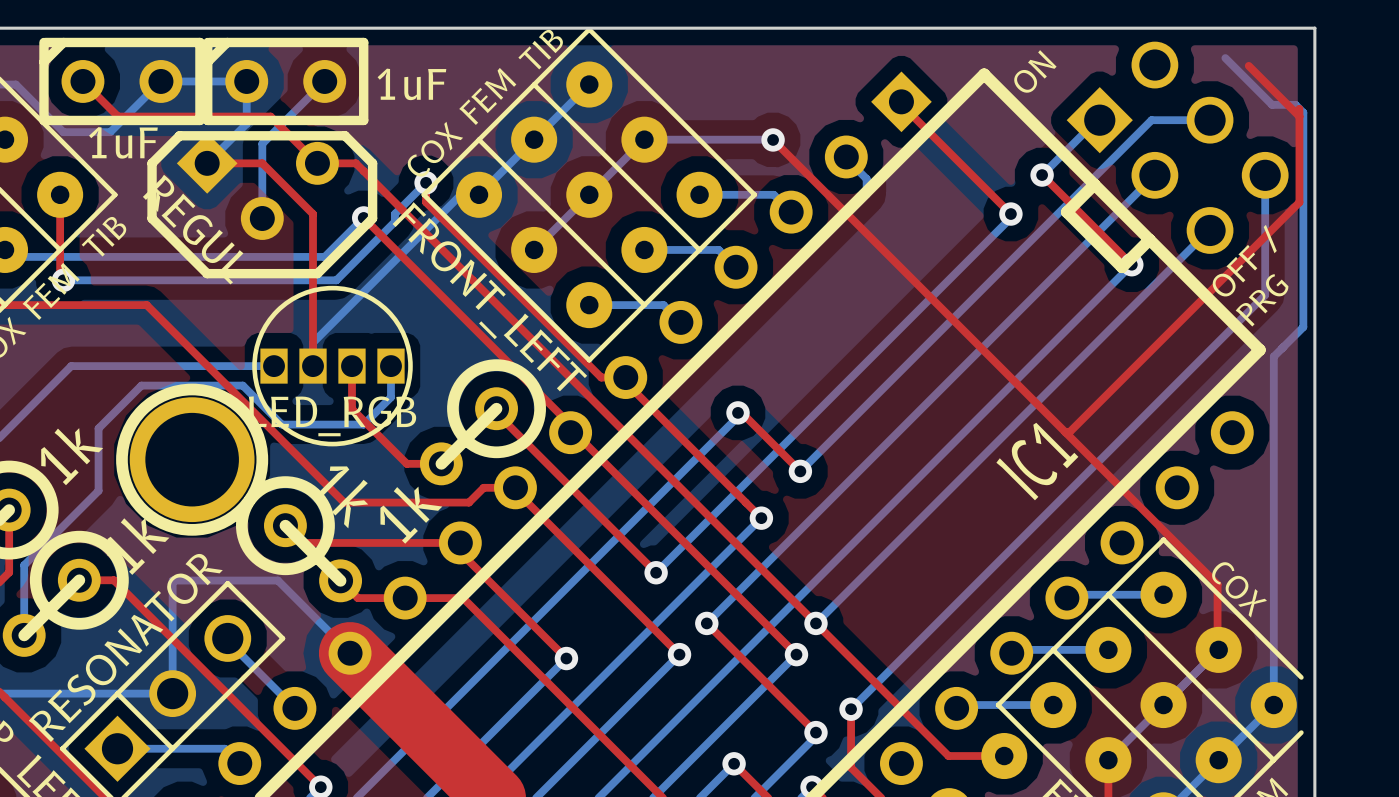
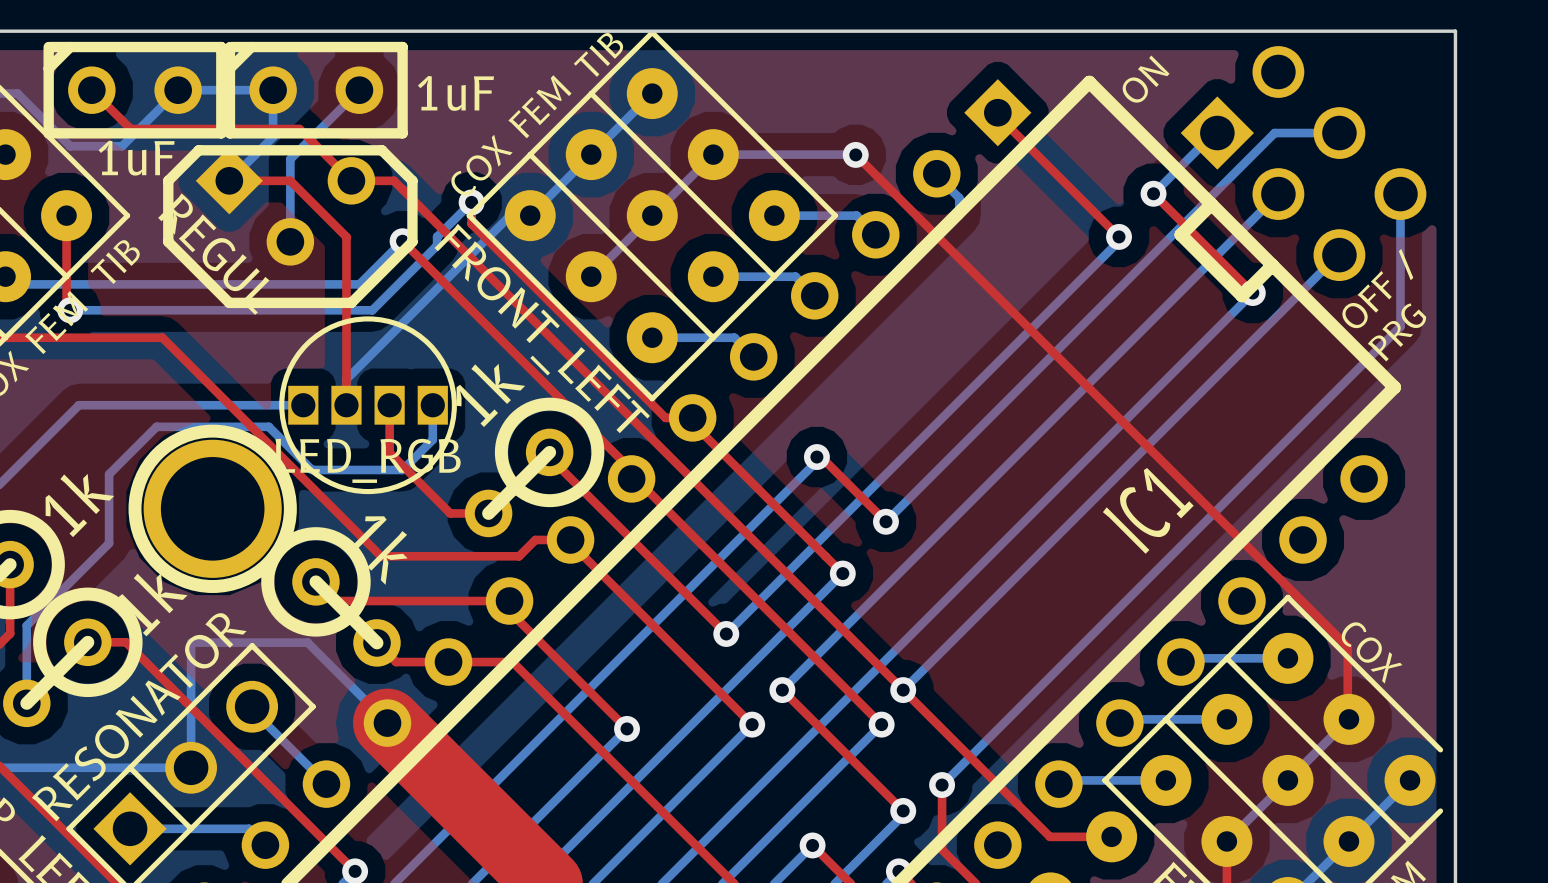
bottom track: (1225, 58) (1272, 104) (1295, 104) (1303, 112) (1303, 327) (1273, 356) (1273, 705) -> none
top track: (1248, 65) (1299, 116) -> none
top track: (1299, 108) (1299, 202) (1069, 432) (1065, 432) -> none
part value position: 1k (411, 515) -> 1k (490, 395)

